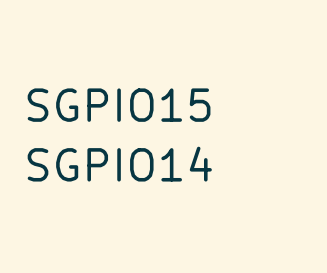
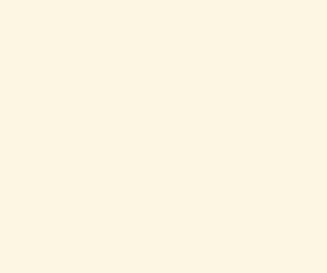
label: SGPIO15 (119, 105) -> none
label: SGPIO14 (119, 164) -> none

